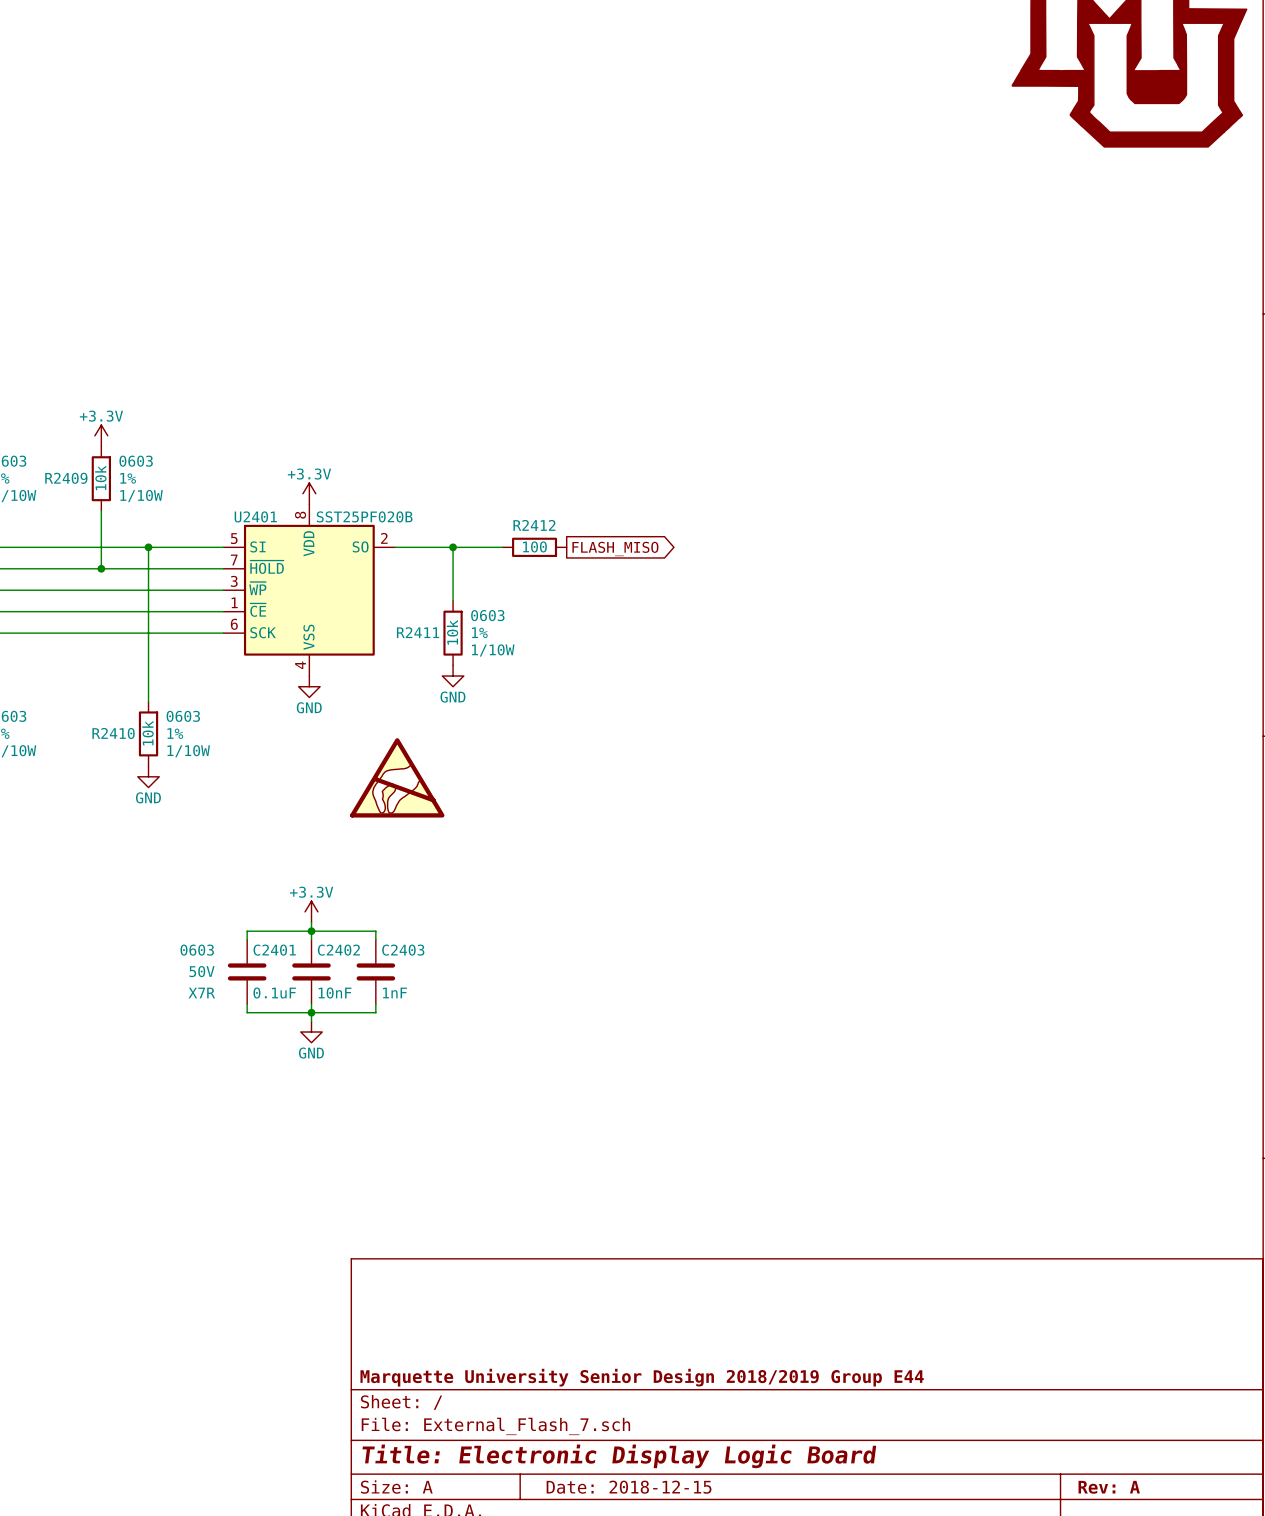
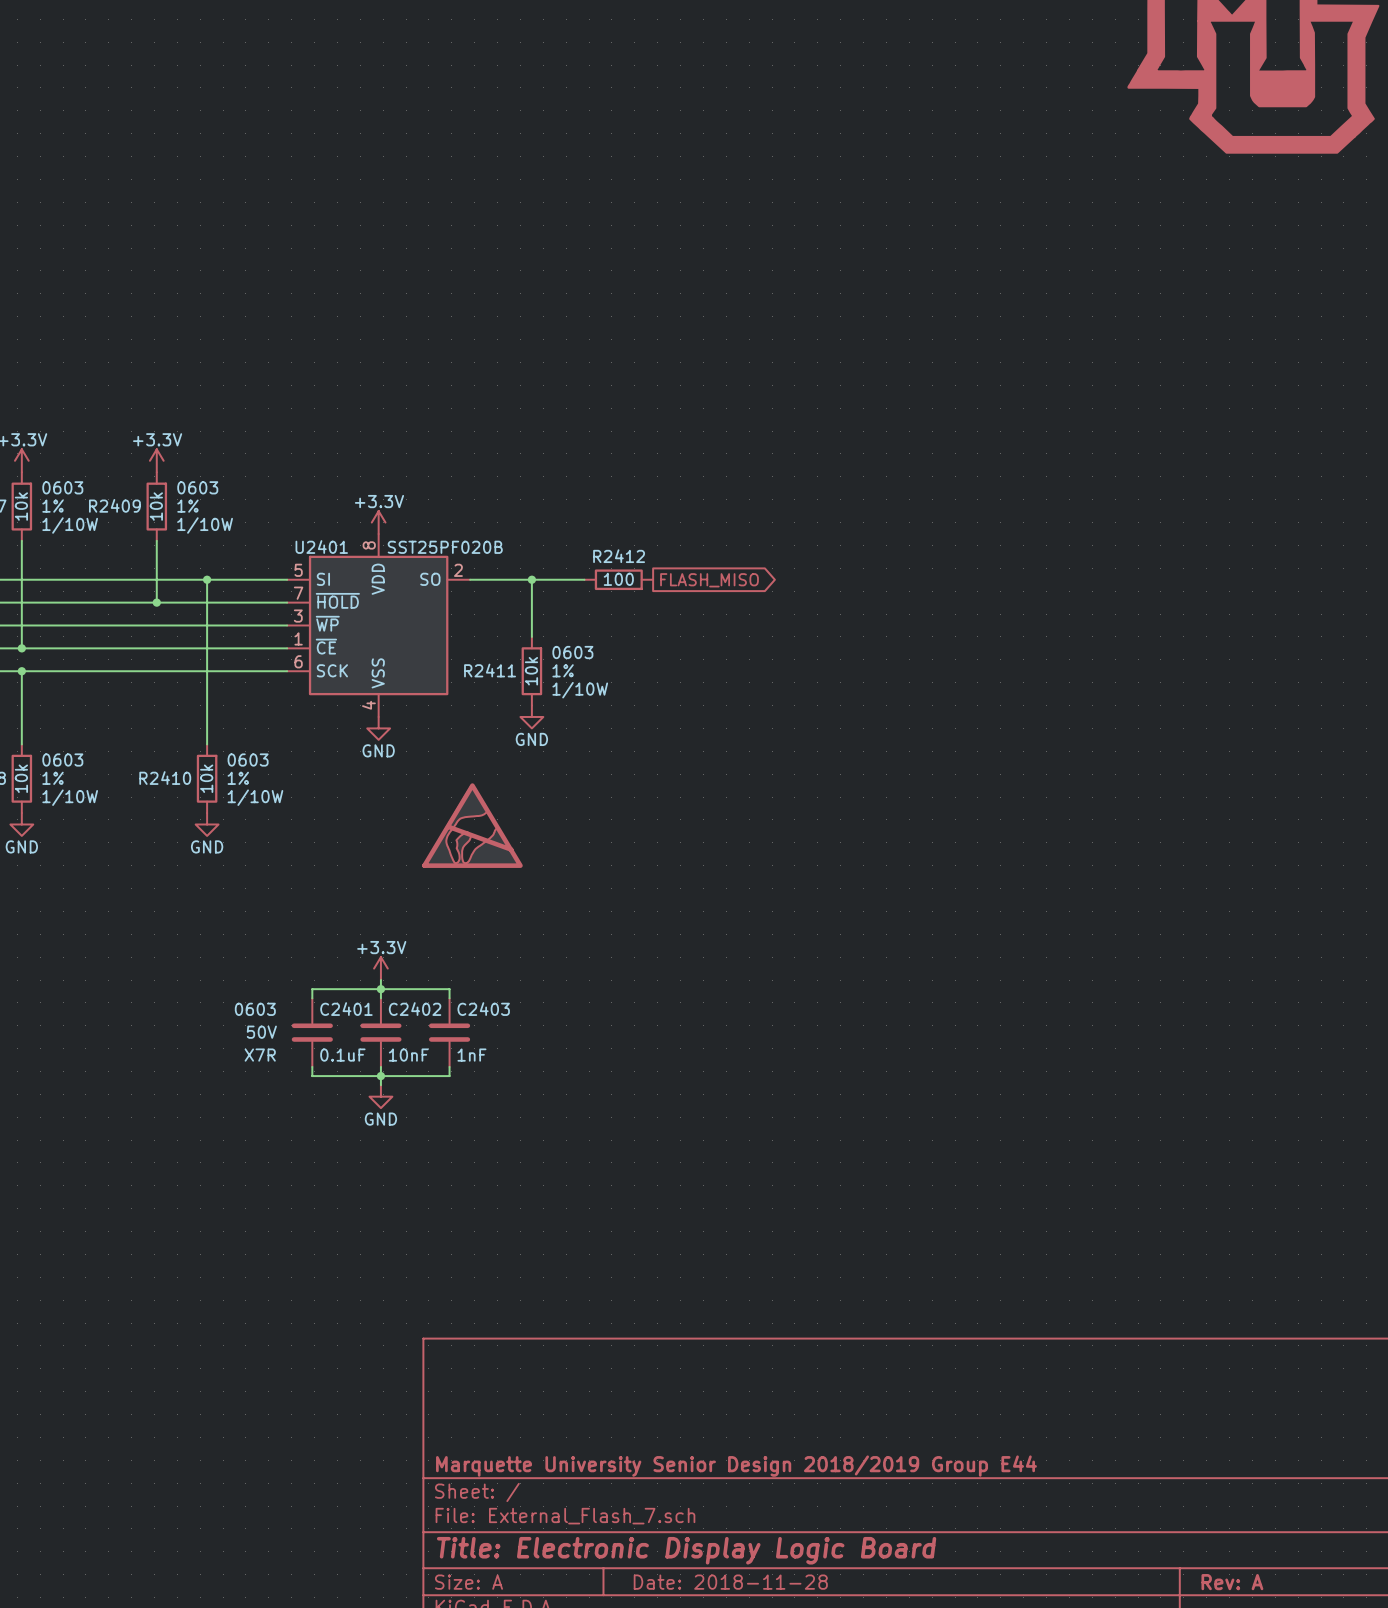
title block: Date: 2018-12-15 (629, 1487) -> Date: 2018-11-28 (730, 1582)

